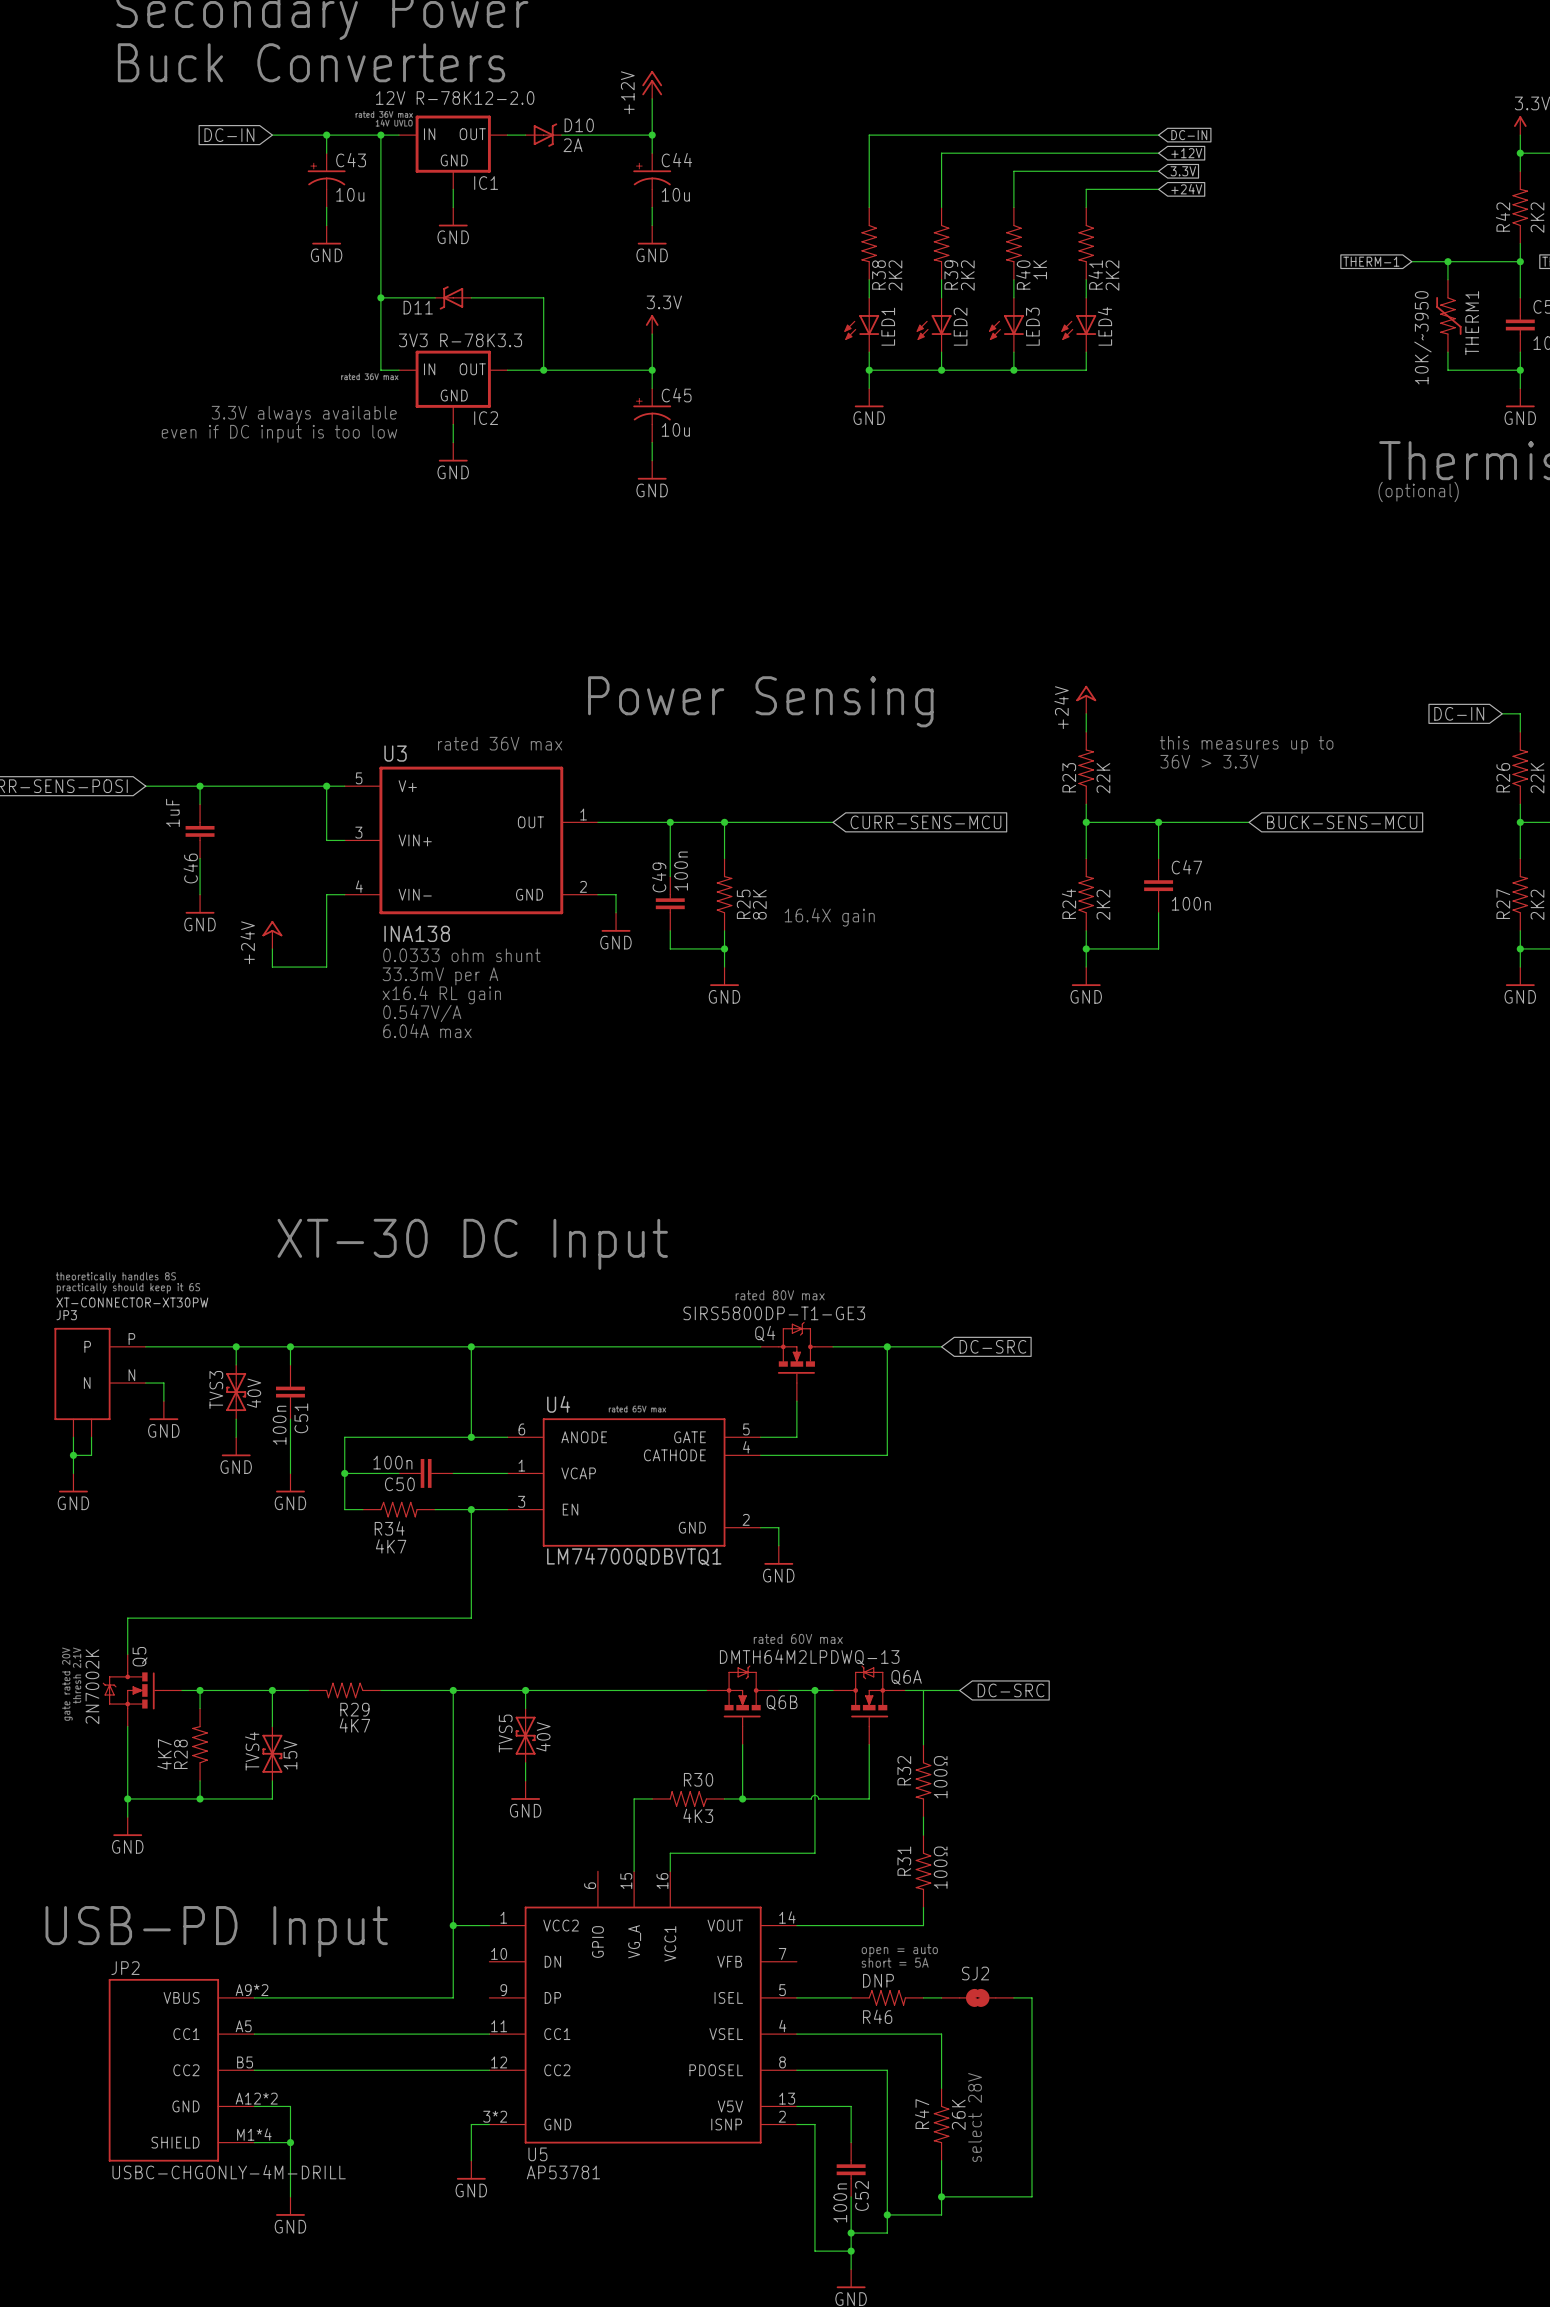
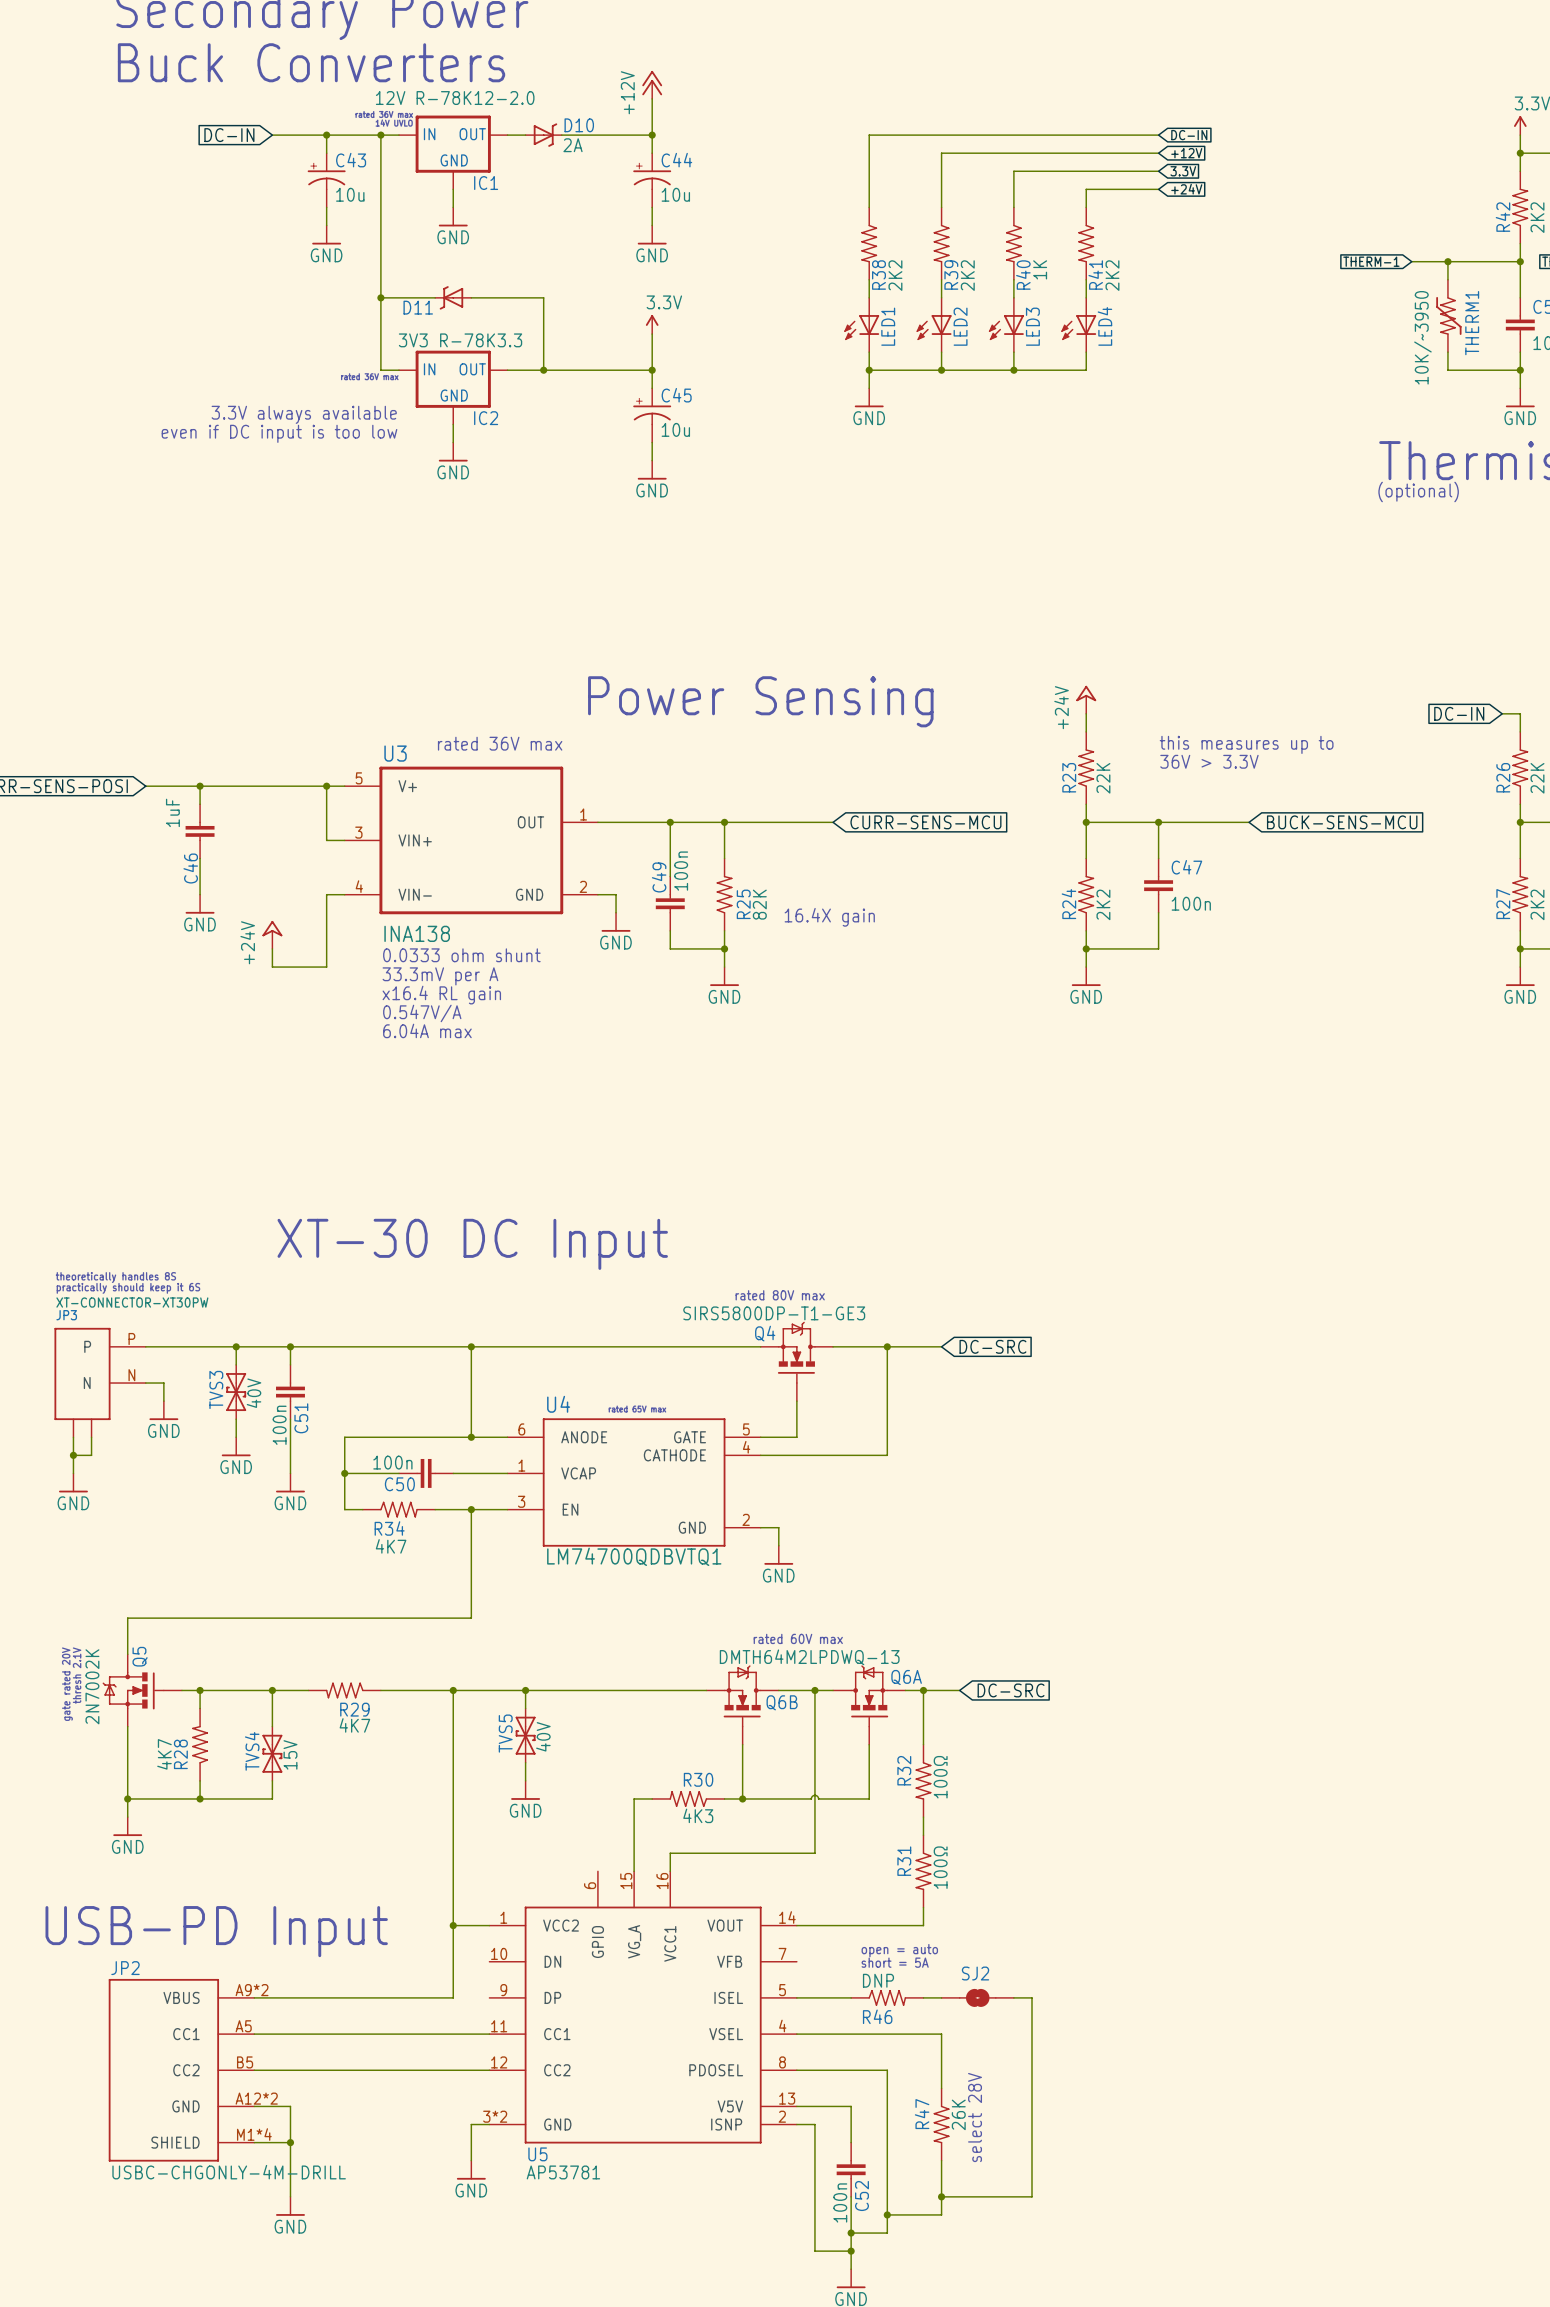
junction: none -> (923, 1690)

